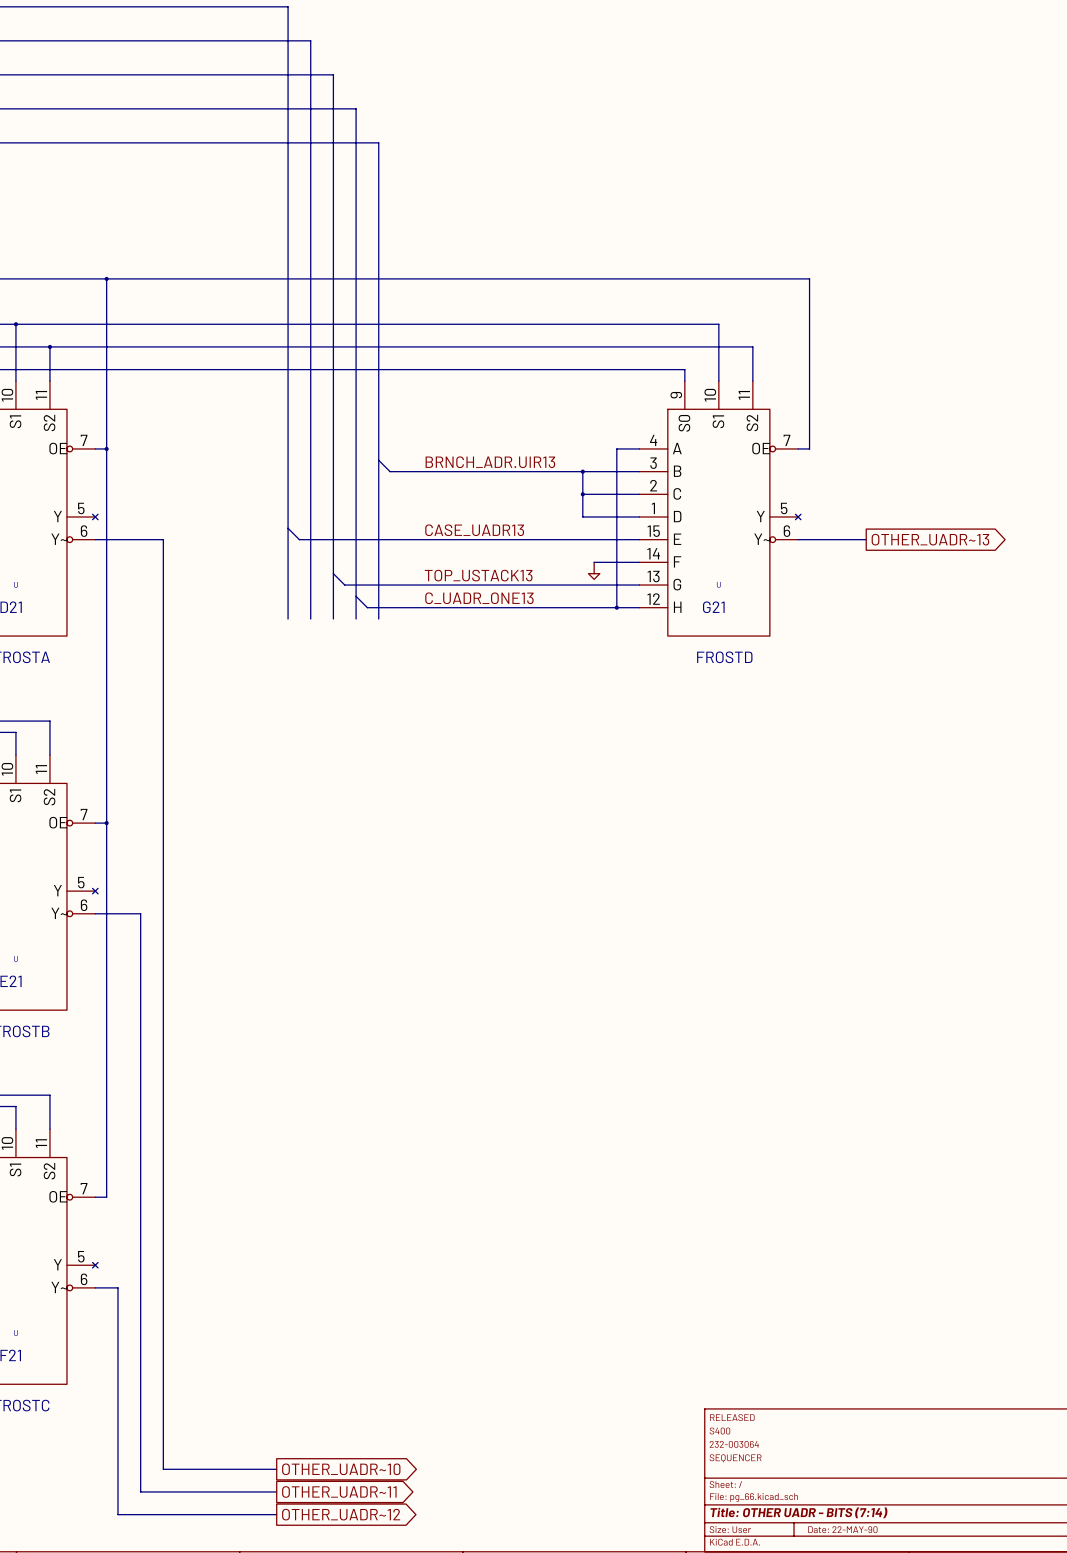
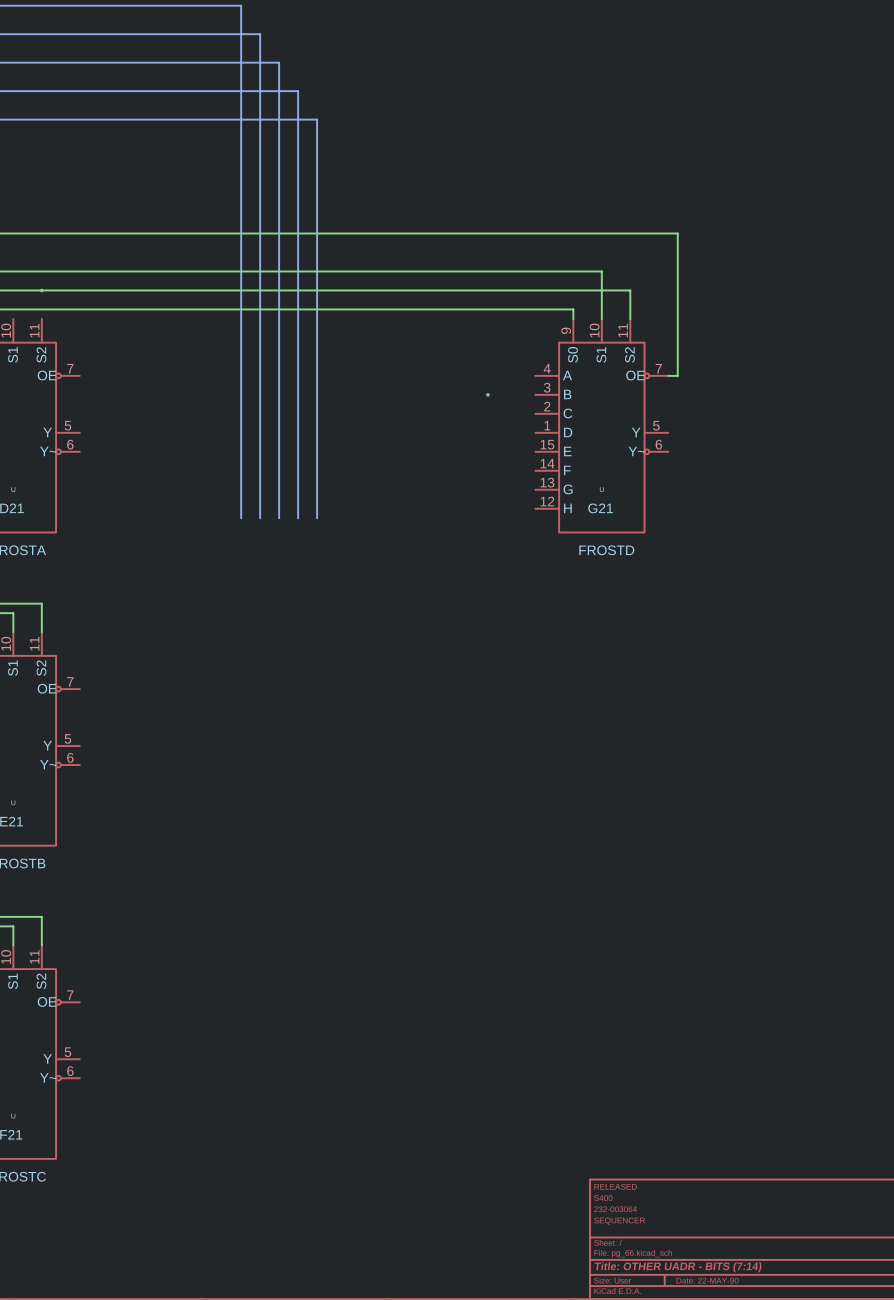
wire: (106, 278) (106, 1197) (95, 1197) -> none
junction: (106, 278) -> none
wire: (15, 324) (15, 380) -> none
junction: (15, 324) -> none
wire: (49, 346) (49, 380) -> none
wire: (95, 448) (106, 448) -> none
junction: (106, 448) -> none
wire: (639, 448) (616, 448) (616, 607) -> none
wire: (378, 460) (390, 471) (639, 471) -> none
label: BRNCH_ADR.UIR13 (490, 462) -> none
wire: (582, 471) (582, 516) (639, 516) -> none
wire: (582, 494) (639, 494) -> none
junction: (582, 494) -> none
no-connect mark: (95, 516) -> none
no-connect mark: (798, 516) -> none
wire: (288, 528) (299, 539) (639, 539) -> none
label: CASE_UADR13 (474, 530) -> none
wire: (95, 539) (163, 539) (163, 1469) (276, 1469) -> none
wire: (798, 539) (866, 539) -> none
global label: OTHER_UADR~13 (930, 539) -> none
wire: (594, 562) (639, 562) -> none
power symbol: (594, 571) -> none
wire: (333, 573) (344, 585) (639, 585) -> none
label: TOP_USTACK13 (478, 575) -> none
wire: (356, 596) (367, 607) (639, 607) -> none
label: C_UADR_ONE13 (479, 598) -> none
junction: (616, 607) -> none
wire: (95, 823) (106, 823) -> none
junction: (106, 823) -> none
no-connect mark: (95, 891) -> none
wire: (95, 913) (140, 913) (140, 1491) (276, 1491) -> none
no-connect mark: (95, 1265) -> none
wire: (95, 1287) (117, 1287) (117, 1514) (276, 1514) -> none
global label: OTHER_UADR~10 (341, 1469) -> none
global label: OTHER_UADR~11 (339, 1491) -> none
global label: OTHER_UADR~12 (341, 1514) -> none

